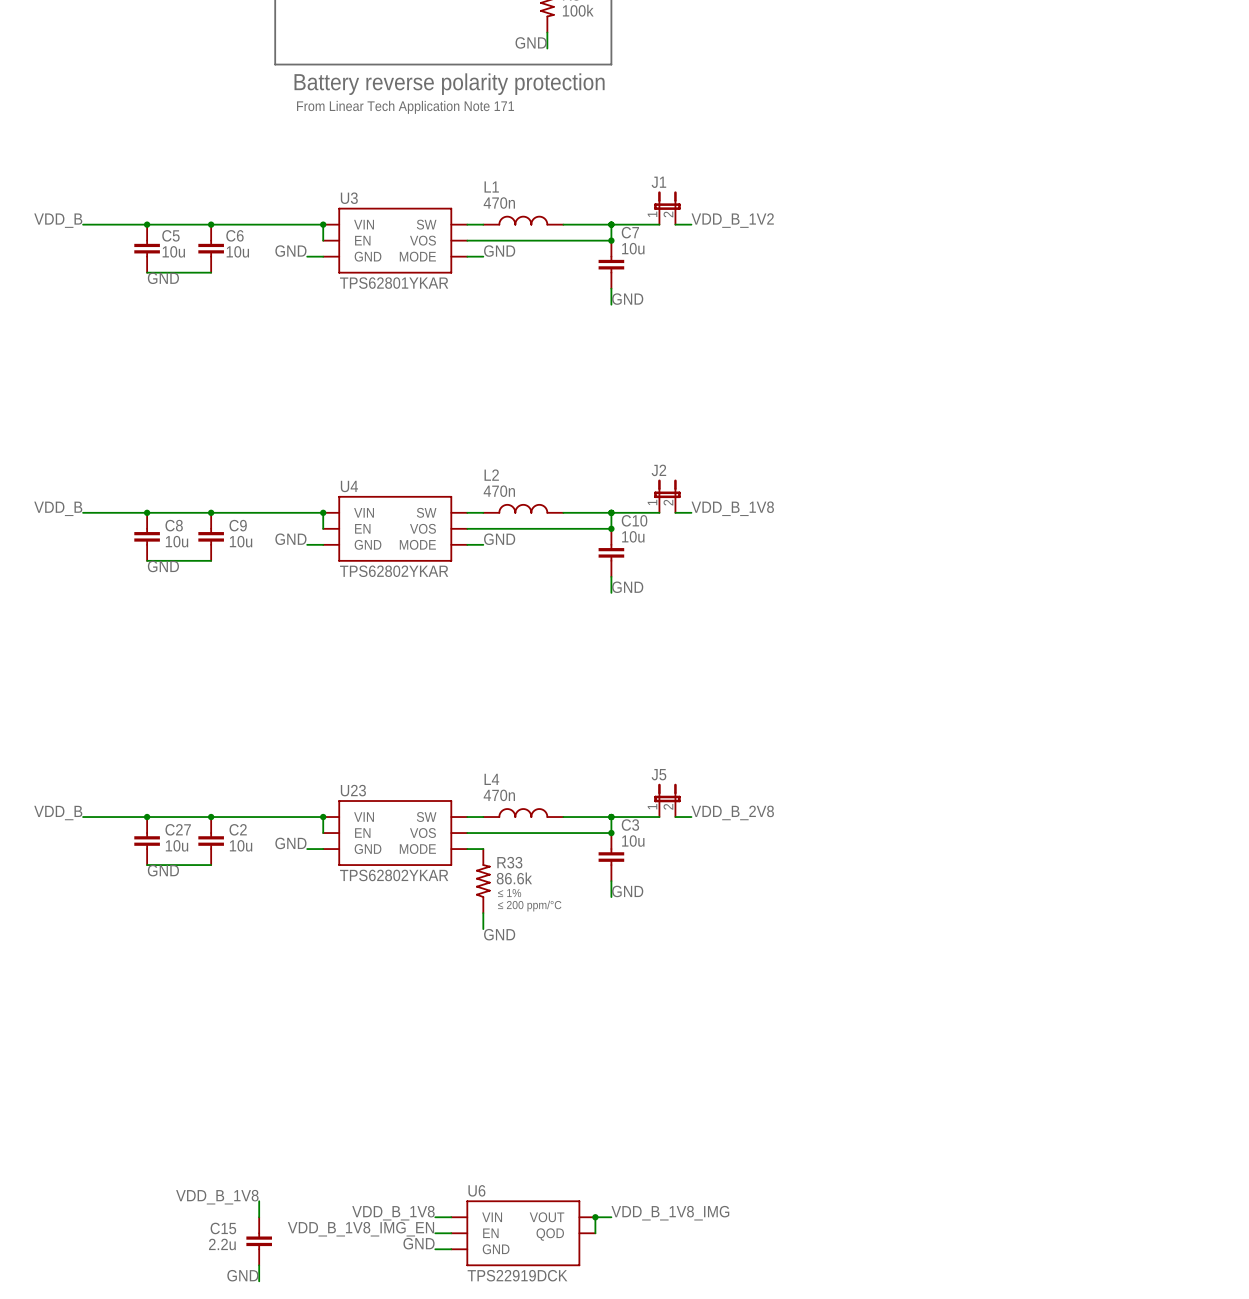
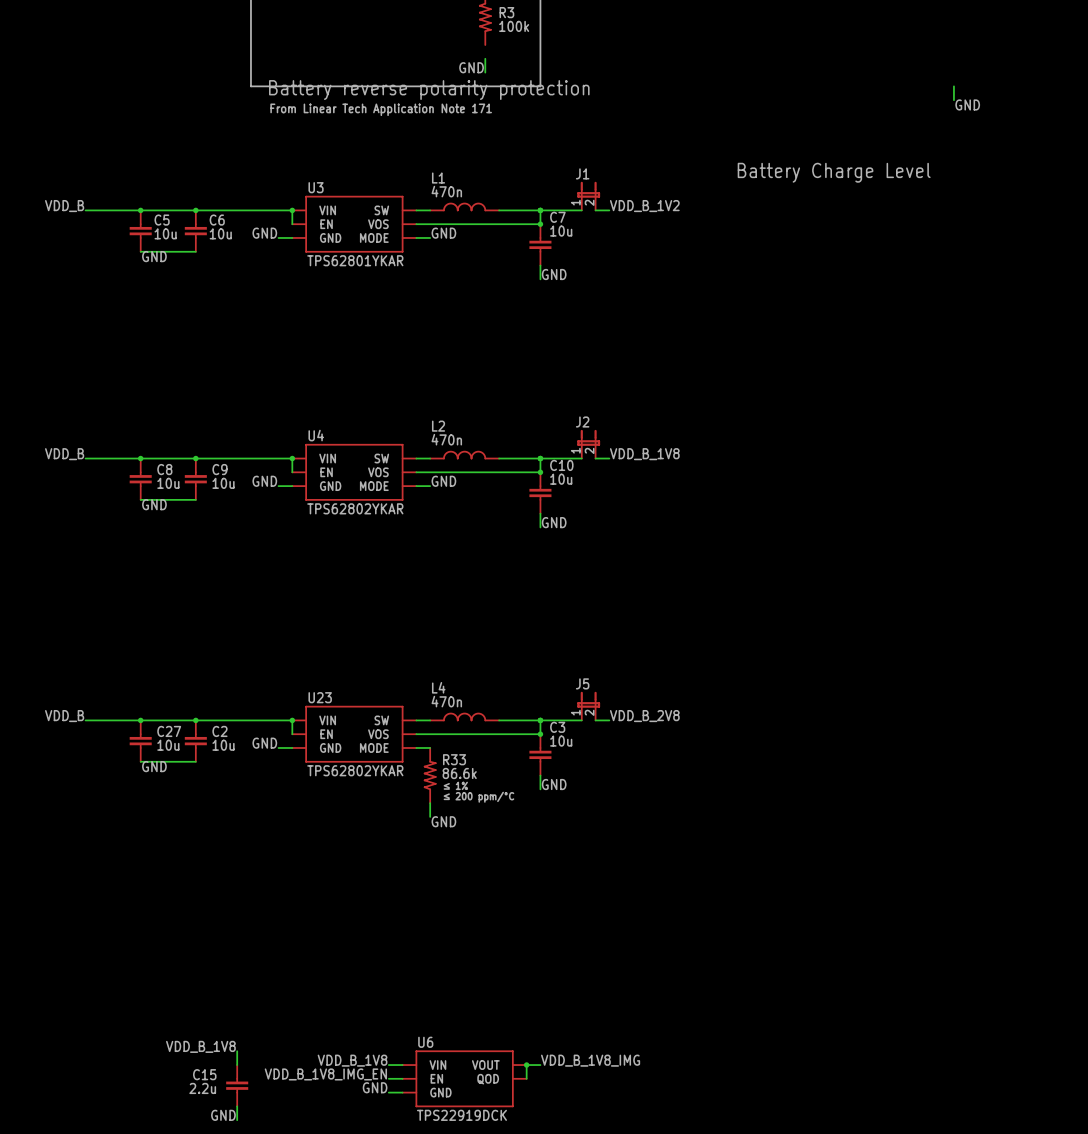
wire: (547, 32) (547, 48) -> (485, 72) (485, 58)
label position: GND (531, 42) -> GND (471, 67)
line: (275, 64) (611, 64) -> (250, 72) (250, 86) (540, 86) (540, 72)
wire: none -> (953, 86) (953, 100)
label: none -> GND (967, 104)
text: none -> Battery Charge Level (834, 172)

